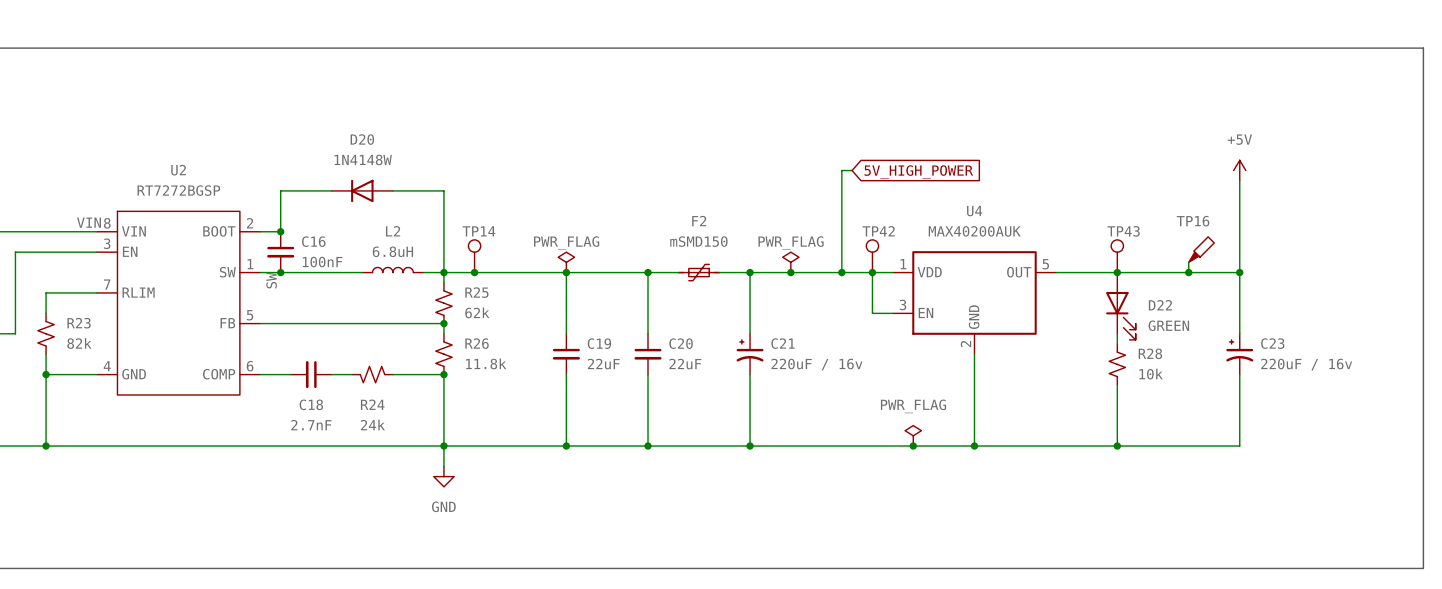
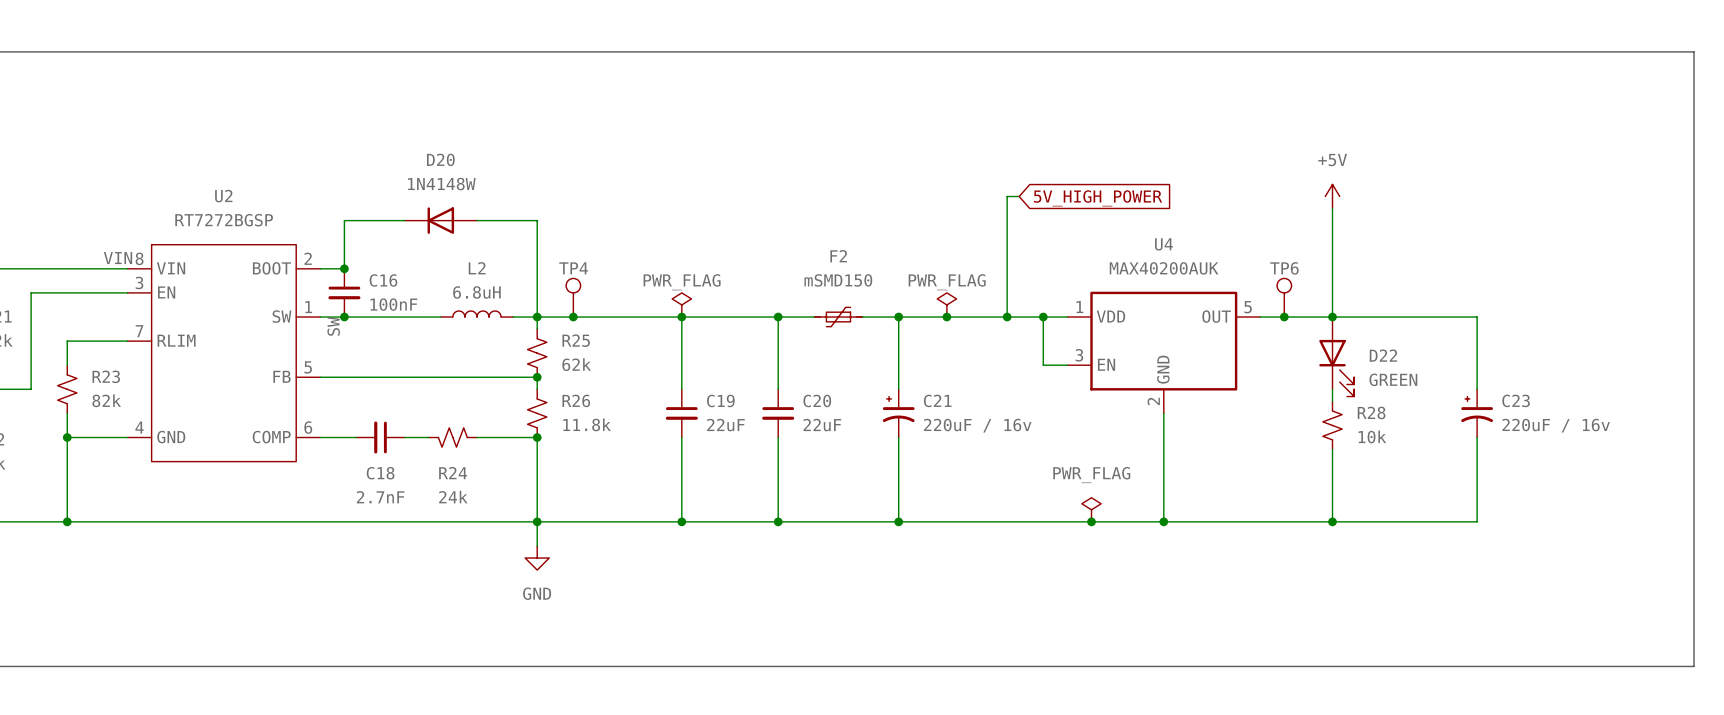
power symbol position: +5V (1239, 170) -> +5V (1332, 196)
wire: (1239, 180) (1239, 272) -> (1332, 208) (1332, 317)
TP14 name: TP14 (478, 231) -> TP4 (573, 268)
TP16: (1201, 249) -> none
TP42: (872, 256) -> none
TP6: none -> (1284, 297)
TP43: (1117, 256) -> none
wire: (1188, 262) (1188, 272) -> none
junction: none -> (1284, 317)
junction: (1188, 272) -> none
junction: (1239, 272) -> none

